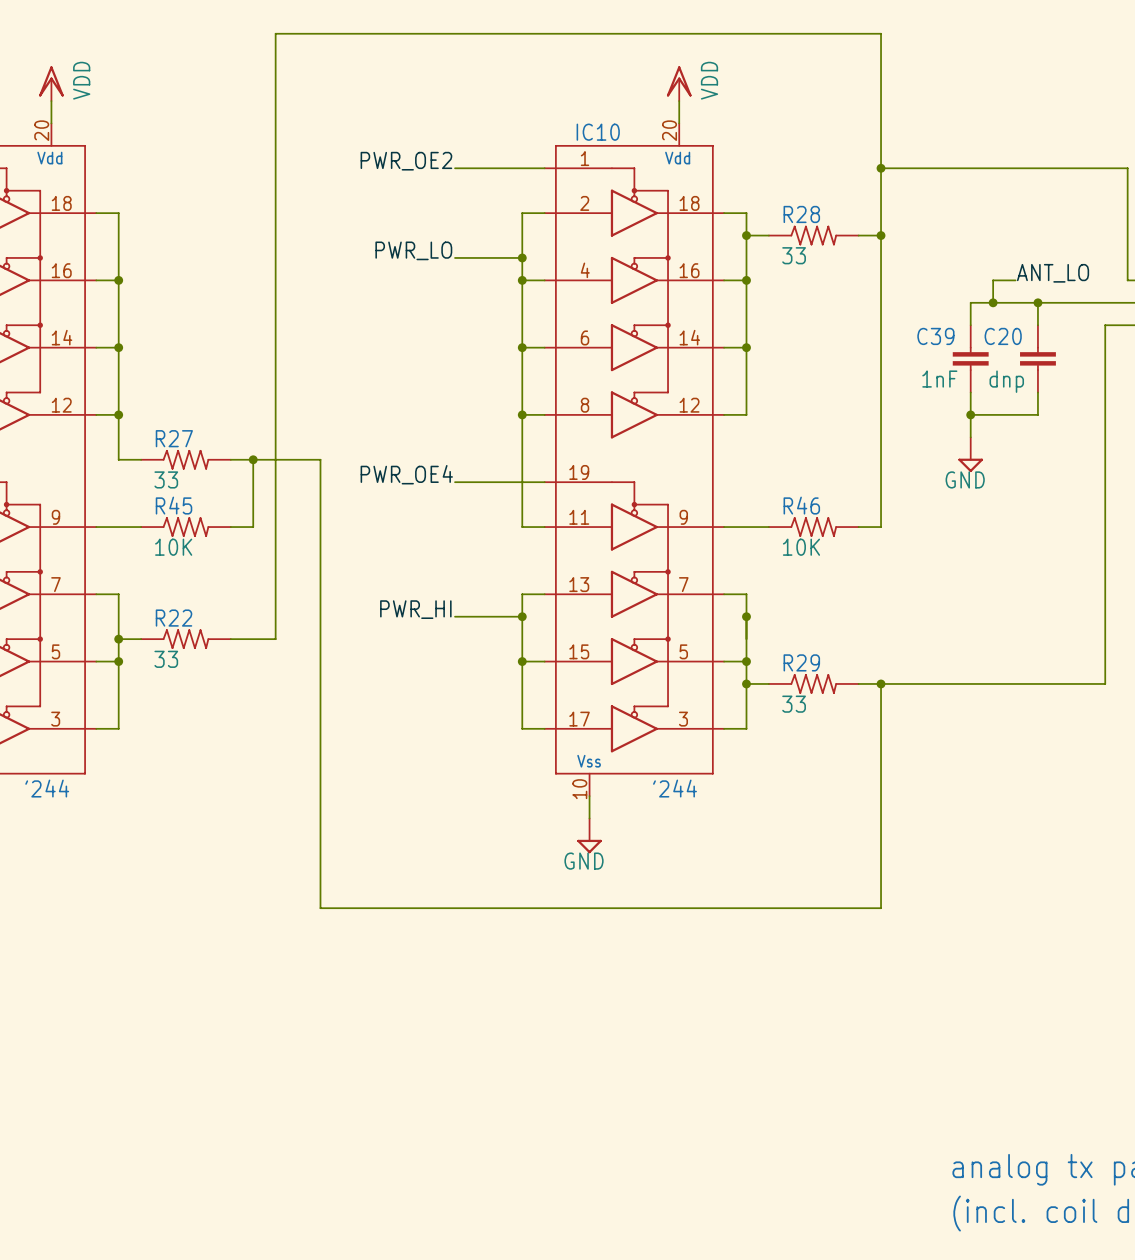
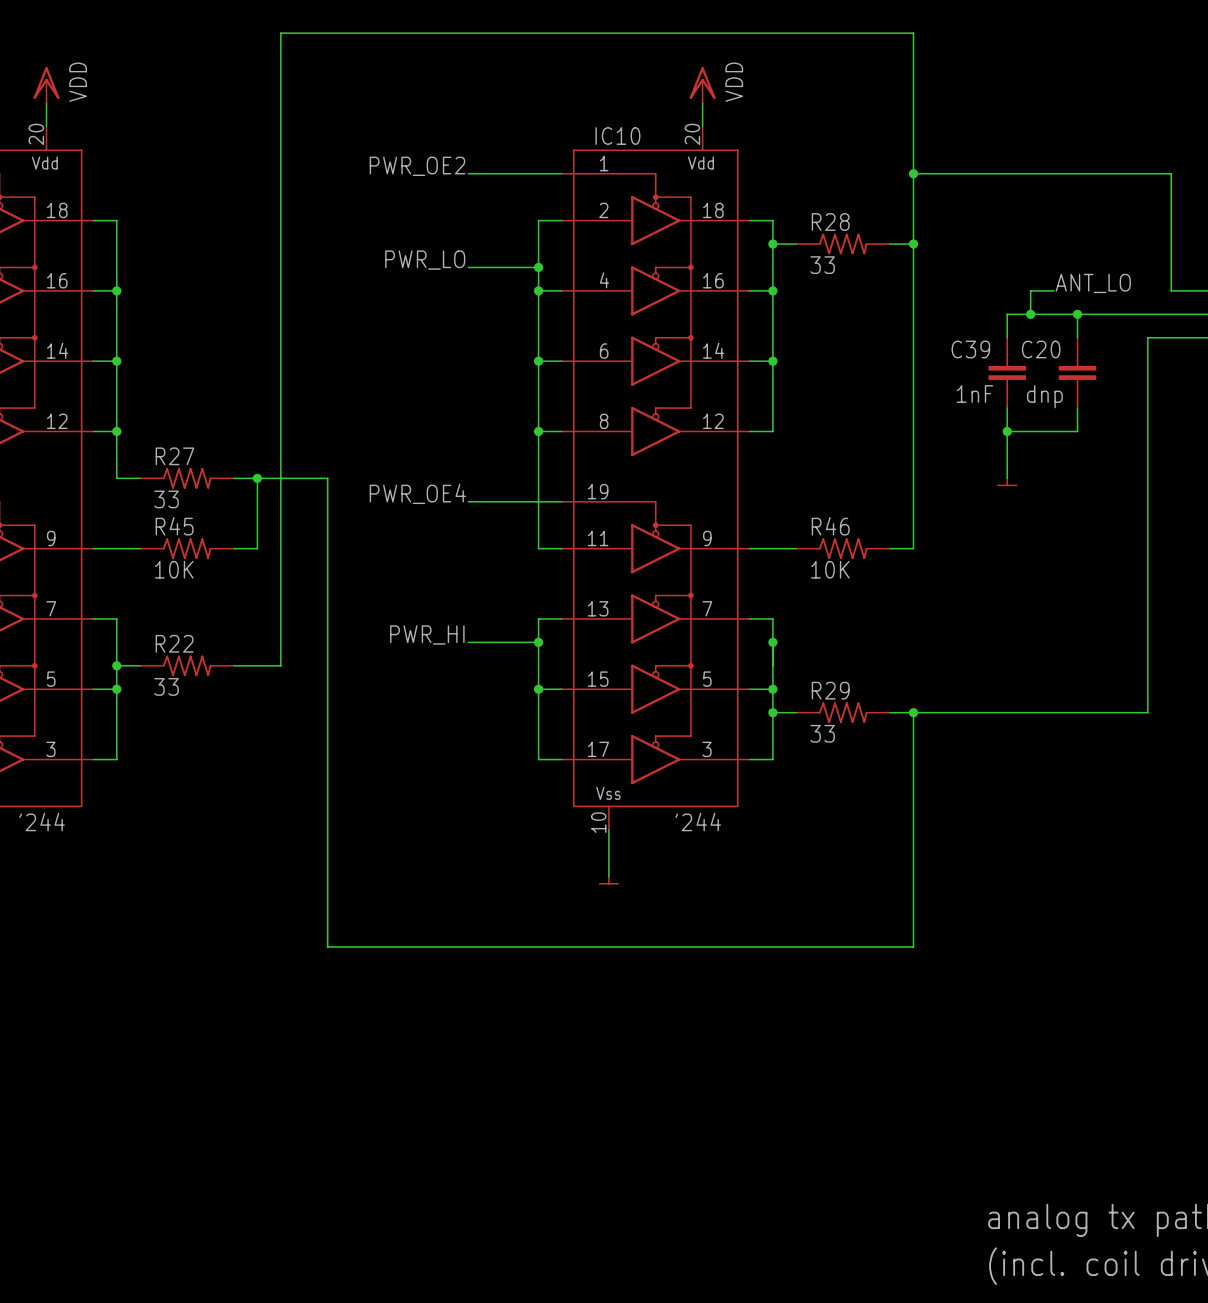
power symbol shape: [958, 437, 984, 473] -> [997, 477, 1018, 487]
power symbol text: GND (965, 479) -> none
power symbol shape: [577, 818, 602, 854] -> [598, 876, 619, 885]
power symbol text: GND (584, 861) -> none

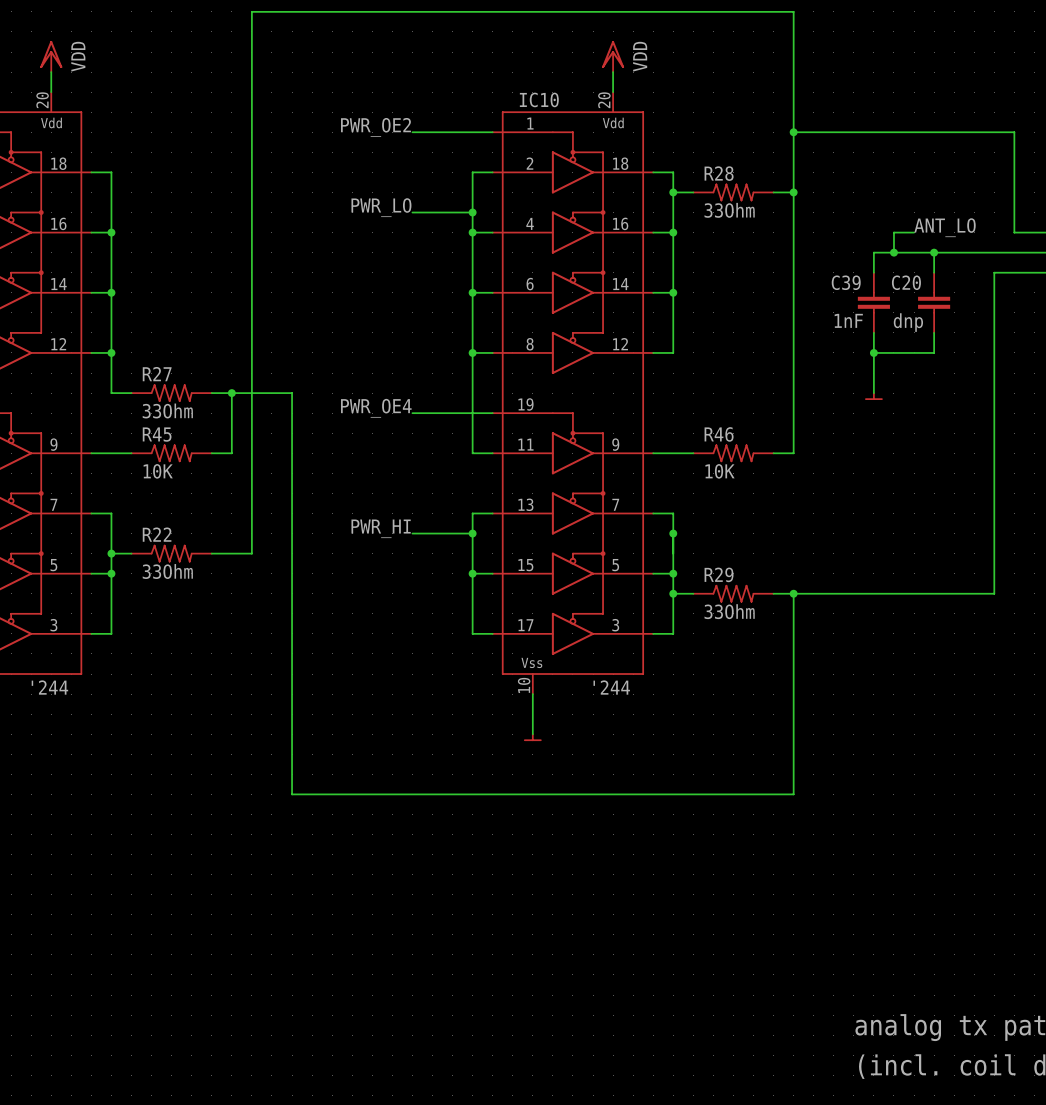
R28 value: 33 (822, 265) -> 33Ohm (729, 210)
R27 value: 33 (166, 499) -> 33Ohm (167, 410)
R22 value: 33 (166, 686) -> 33Ohm (167, 571)
R29 value: 33 (822, 733) -> 33Ohm (729, 611)

